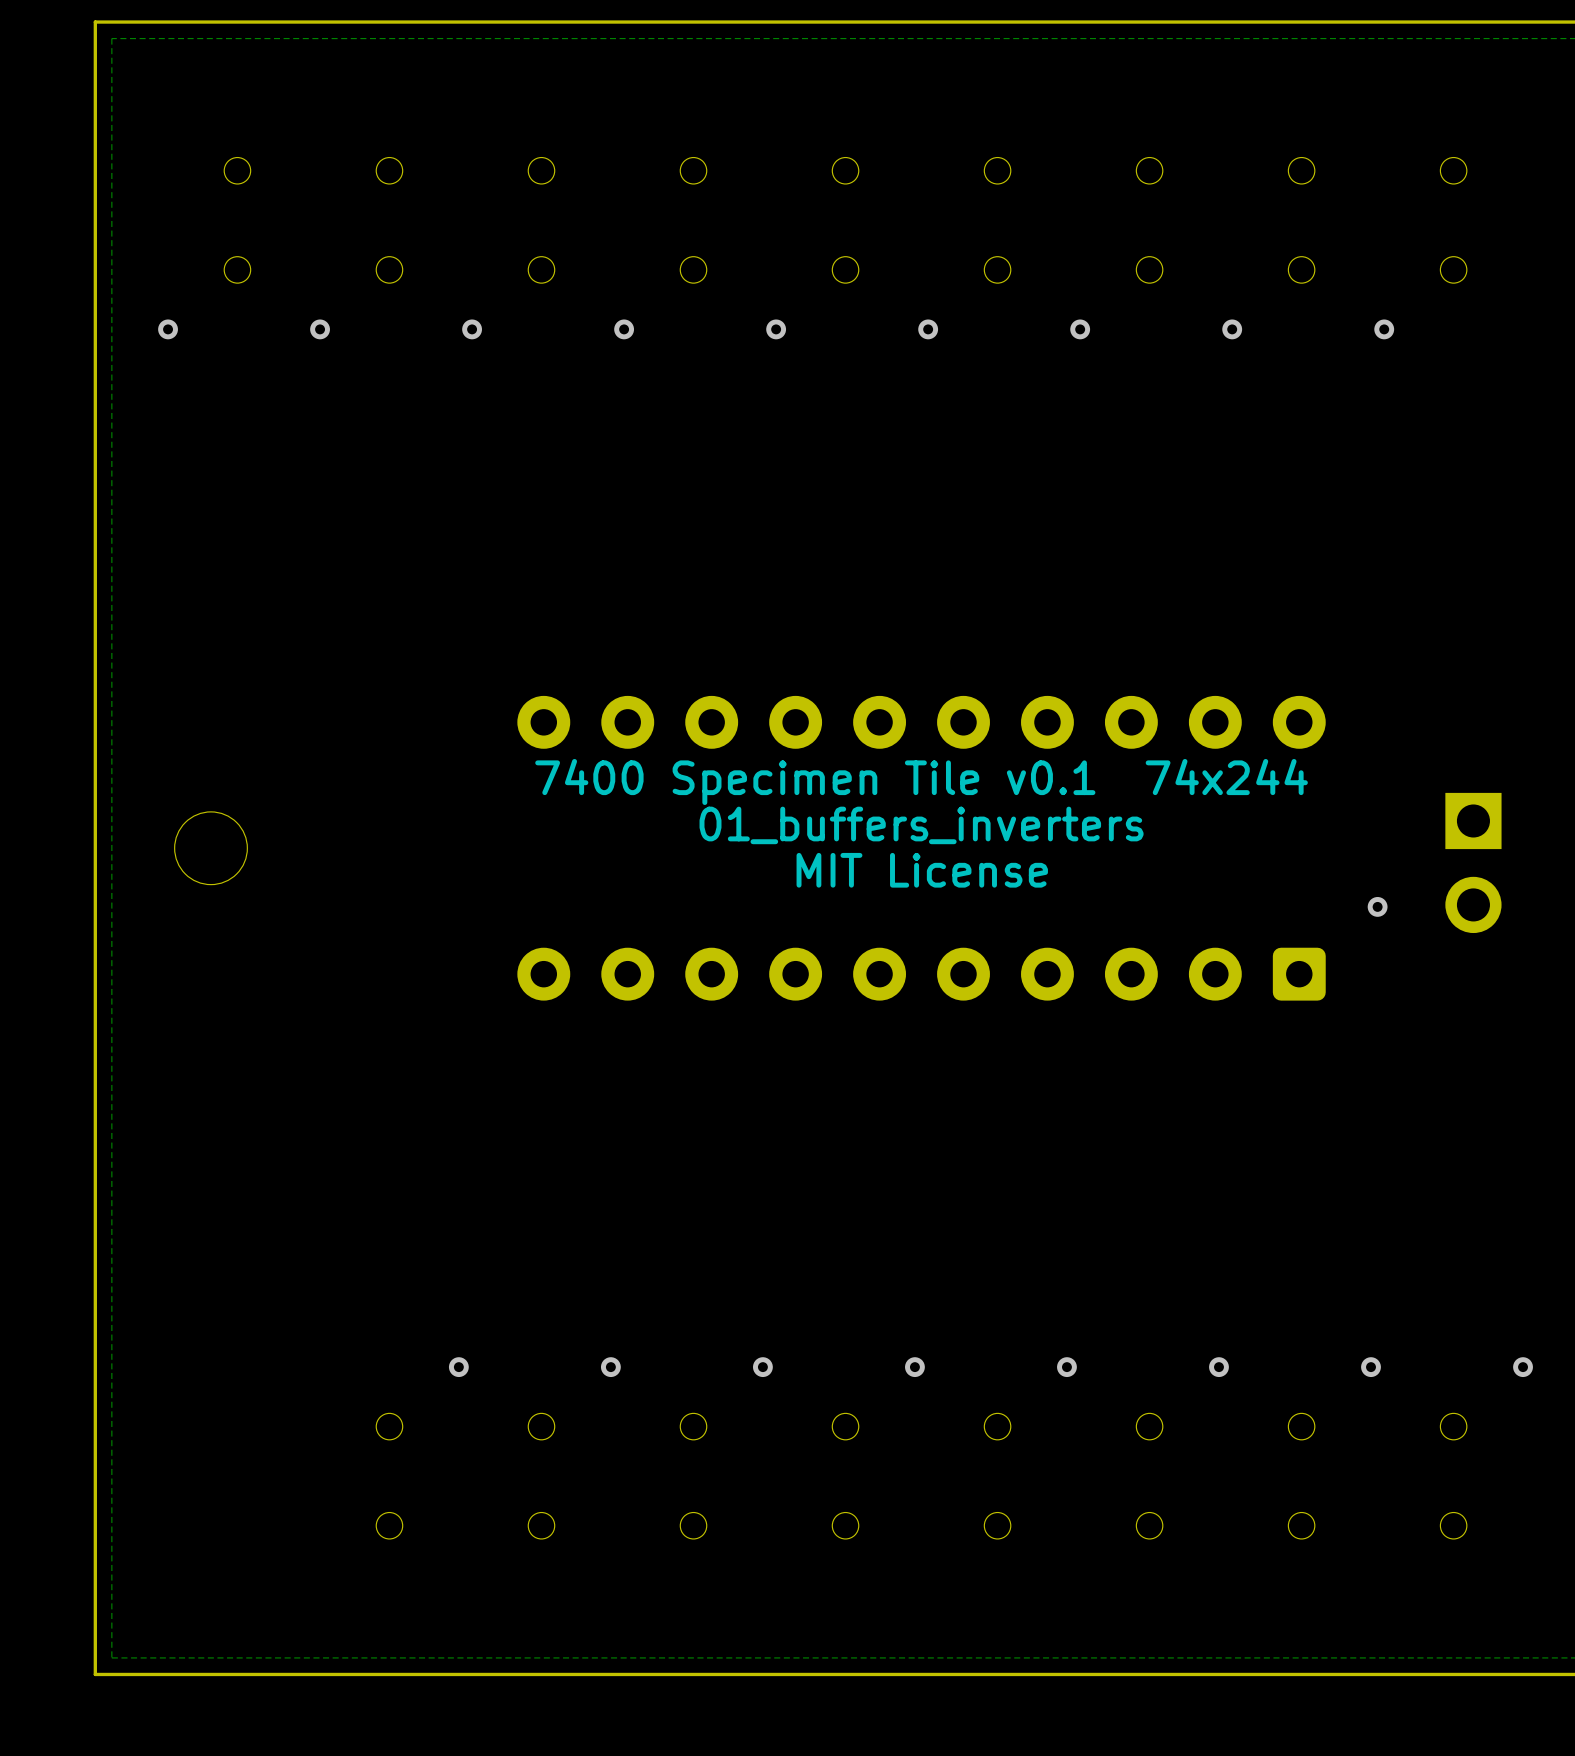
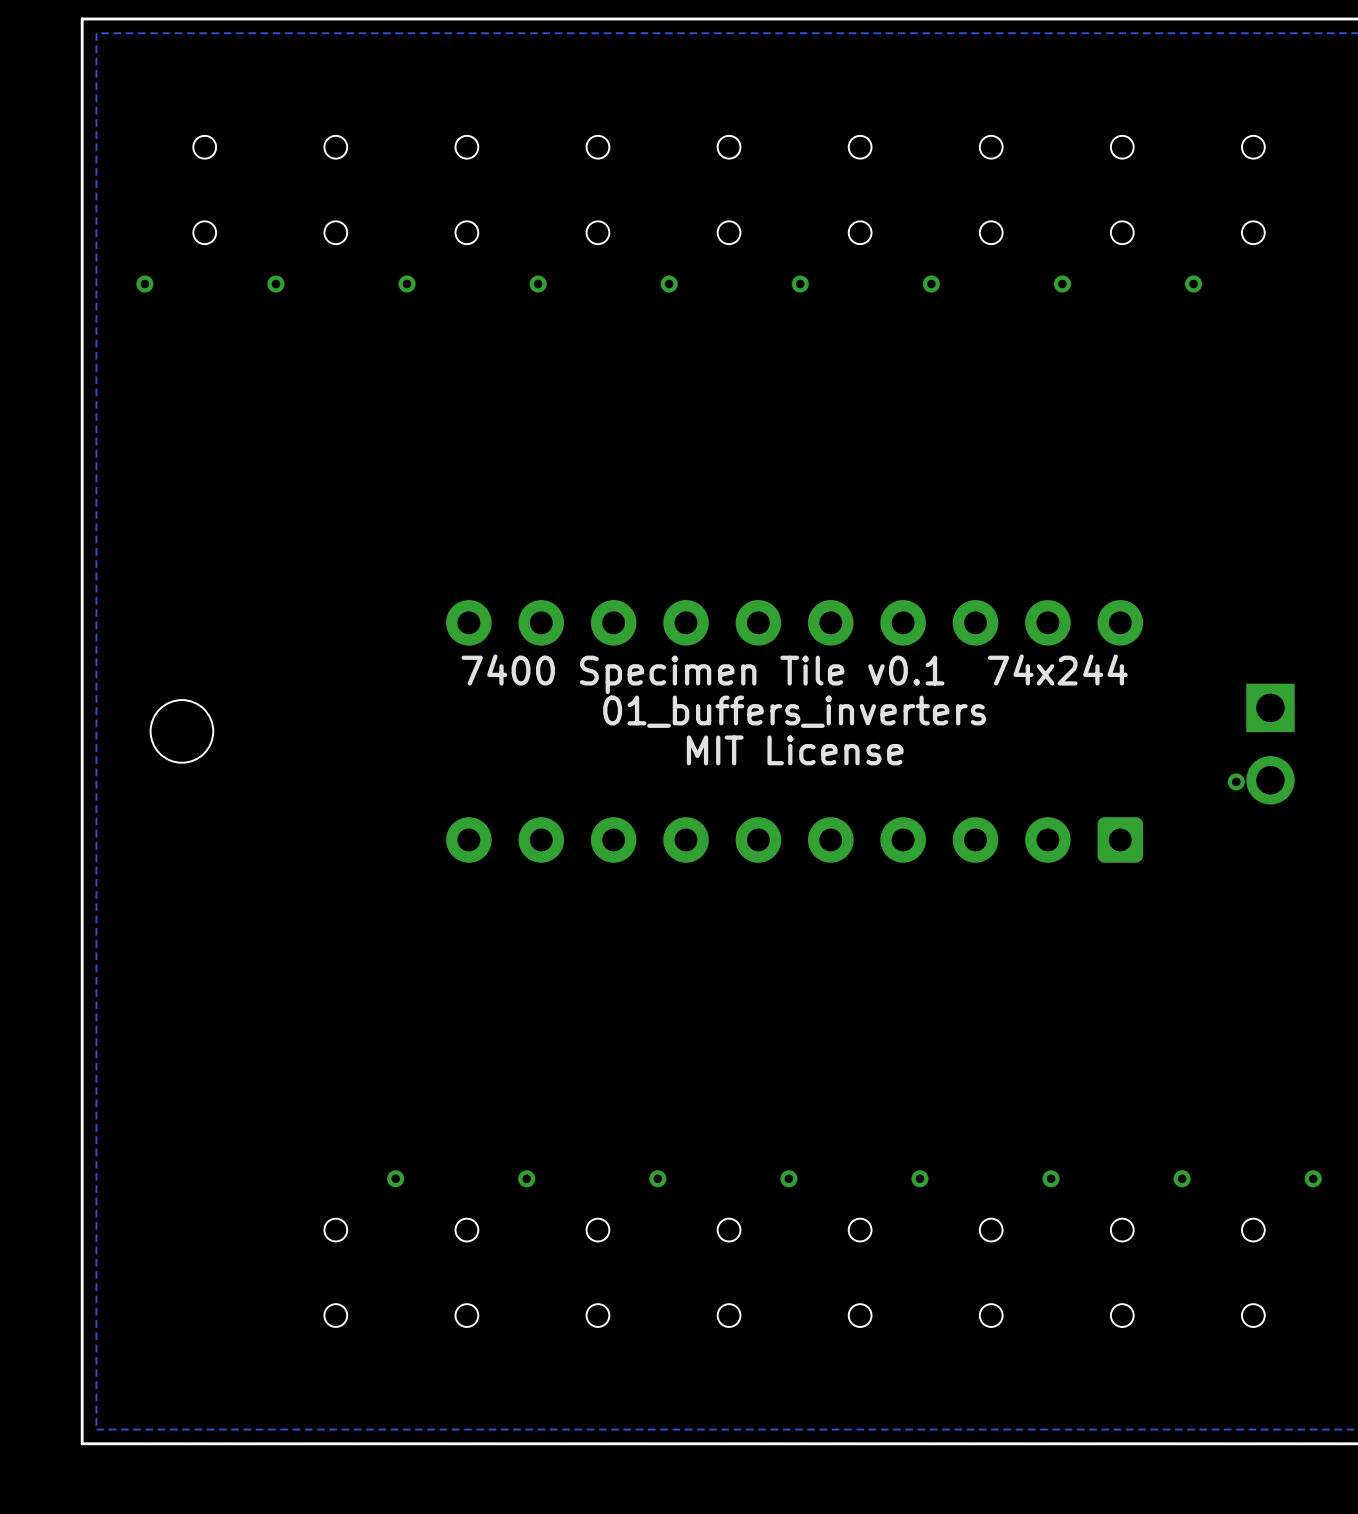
via position: (1377, 906) -> (1236, 781)

